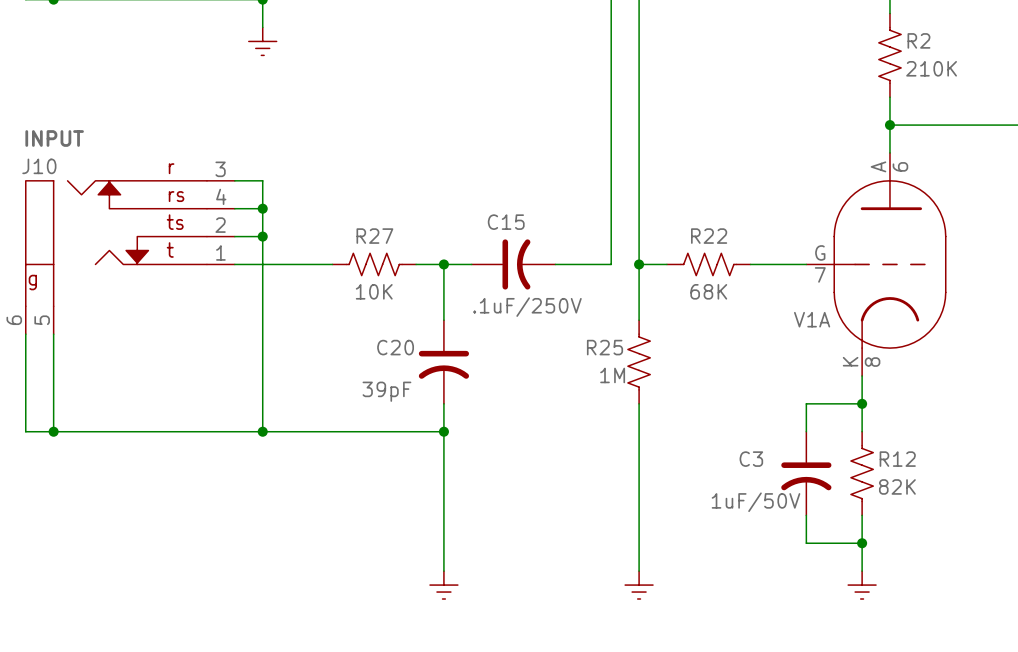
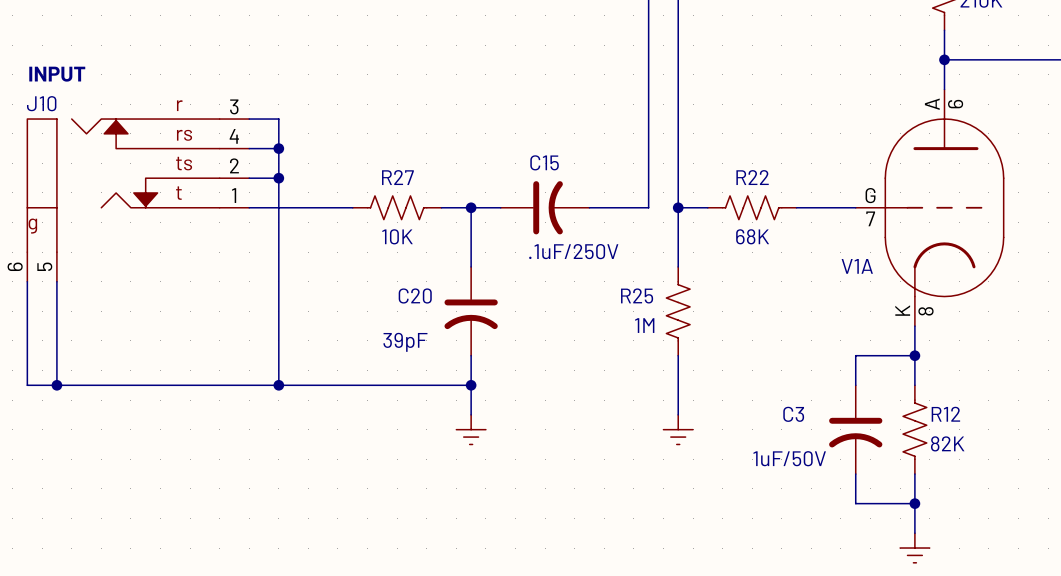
wire: (443, 459) (443, 571) -> none
wire: (639, 459) (639, 571) -> none
power symbol position: (443, 585) -> (471, 429)
power symbol position: (639, 585) -> (678, 429)

